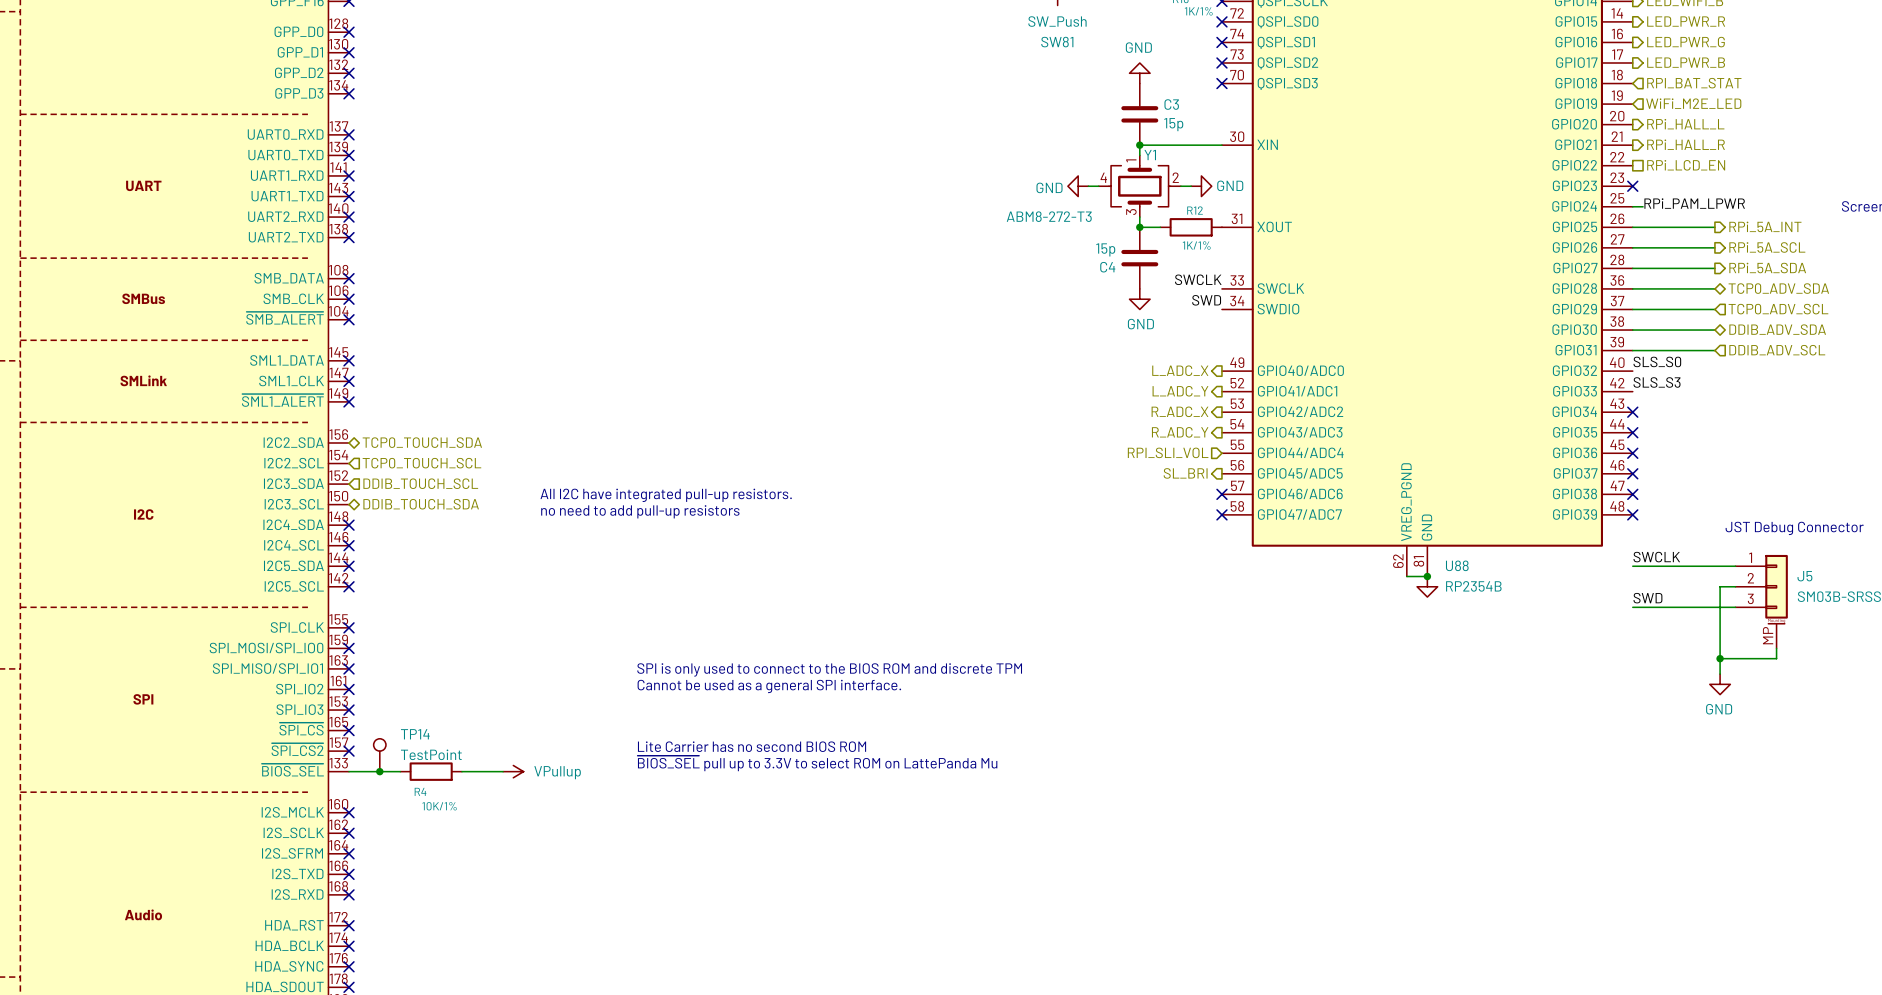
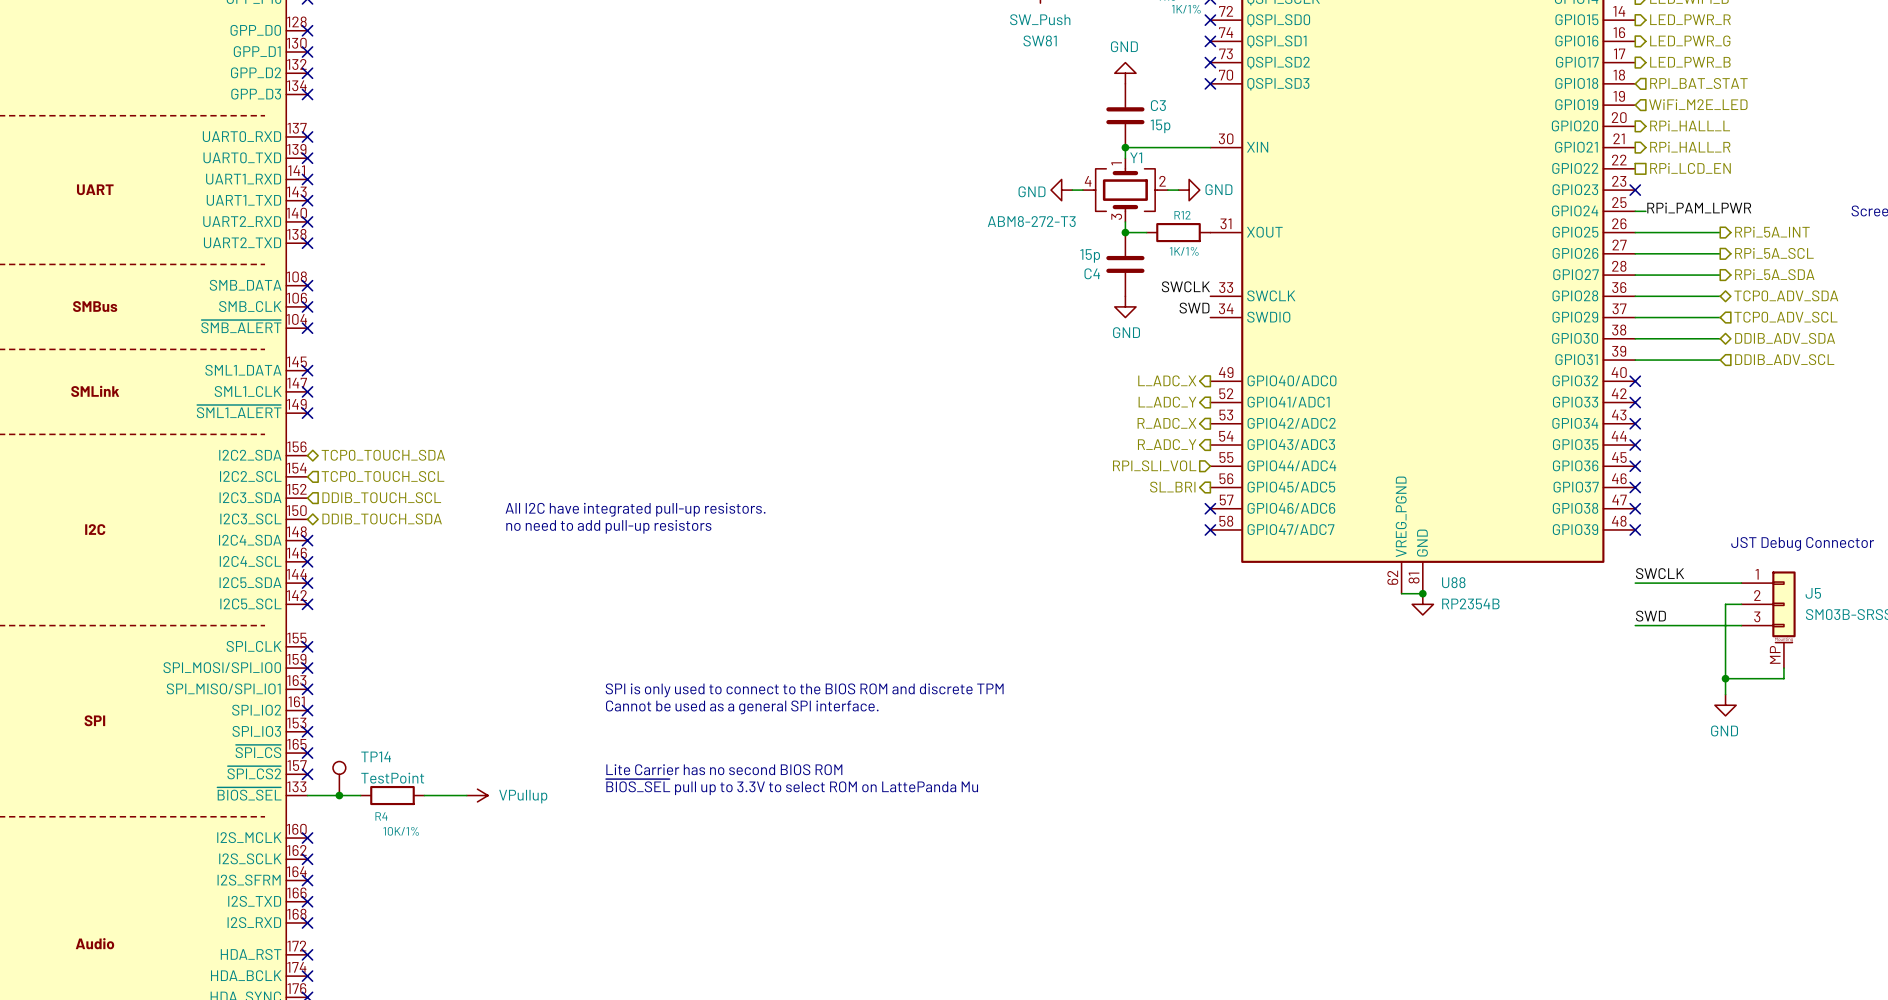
label: SLS_S0 (1657, 361) -> none
no-connect mark: none -> (1635, 381)
label: SLS_S3 (1657, 382) -> none
no-connect mark: none -> (1635, 402)

